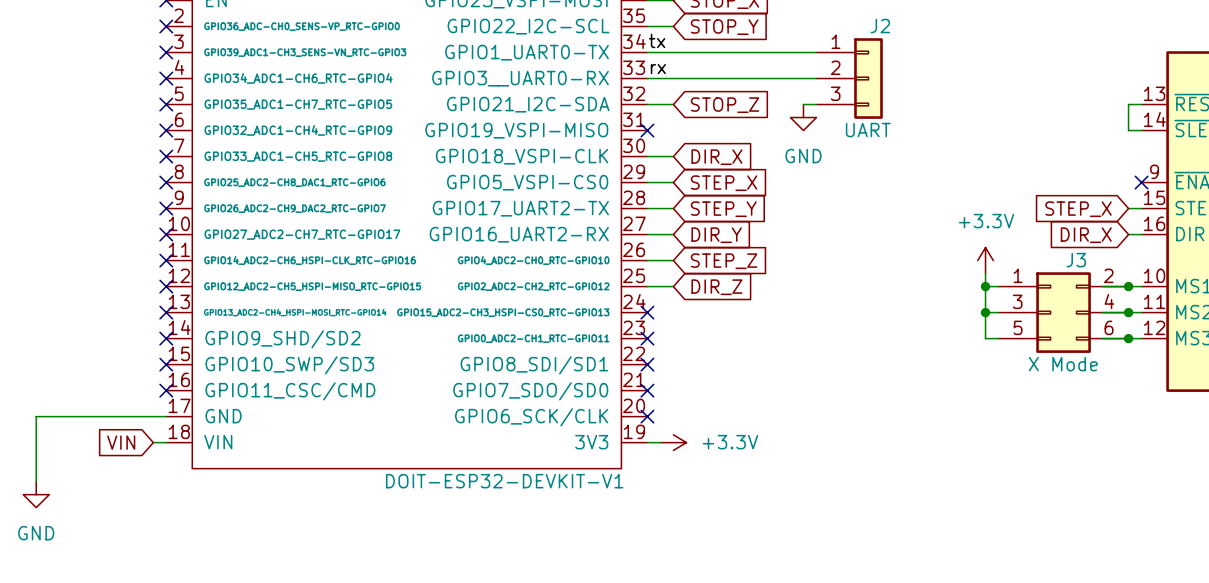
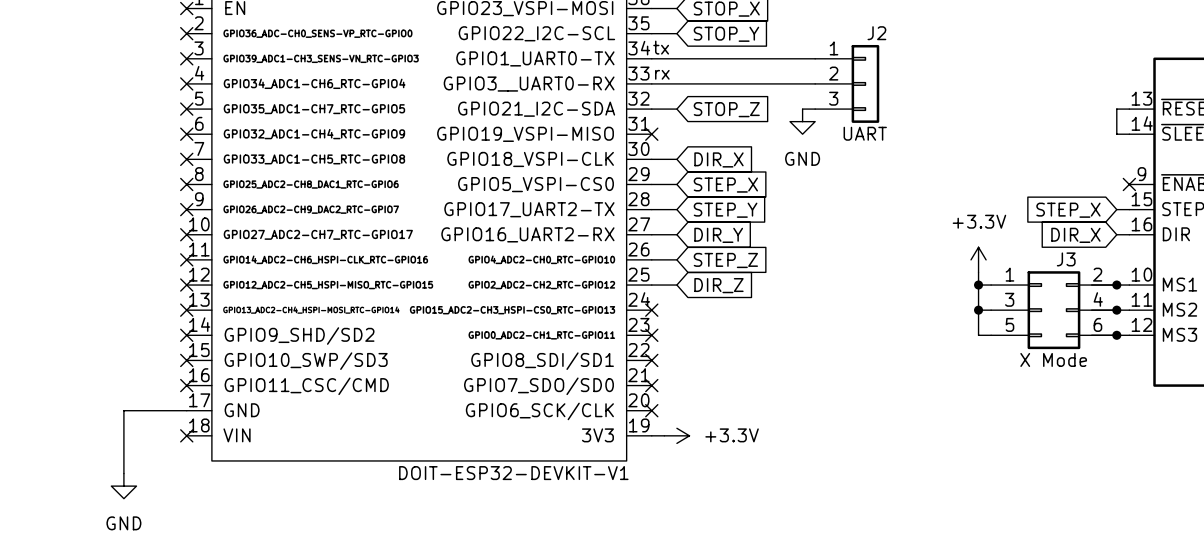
wire: (101, 416) (36, 416) (36, 481) -> (123, 410) (123, 473)
global label: VIN (121, 442) -> none
wire: (153, 442) (166, 442) -> none
no-connect mark: none -> (186, 435)
power symbol position: GND (36, 494) -> GND (123, 486)

